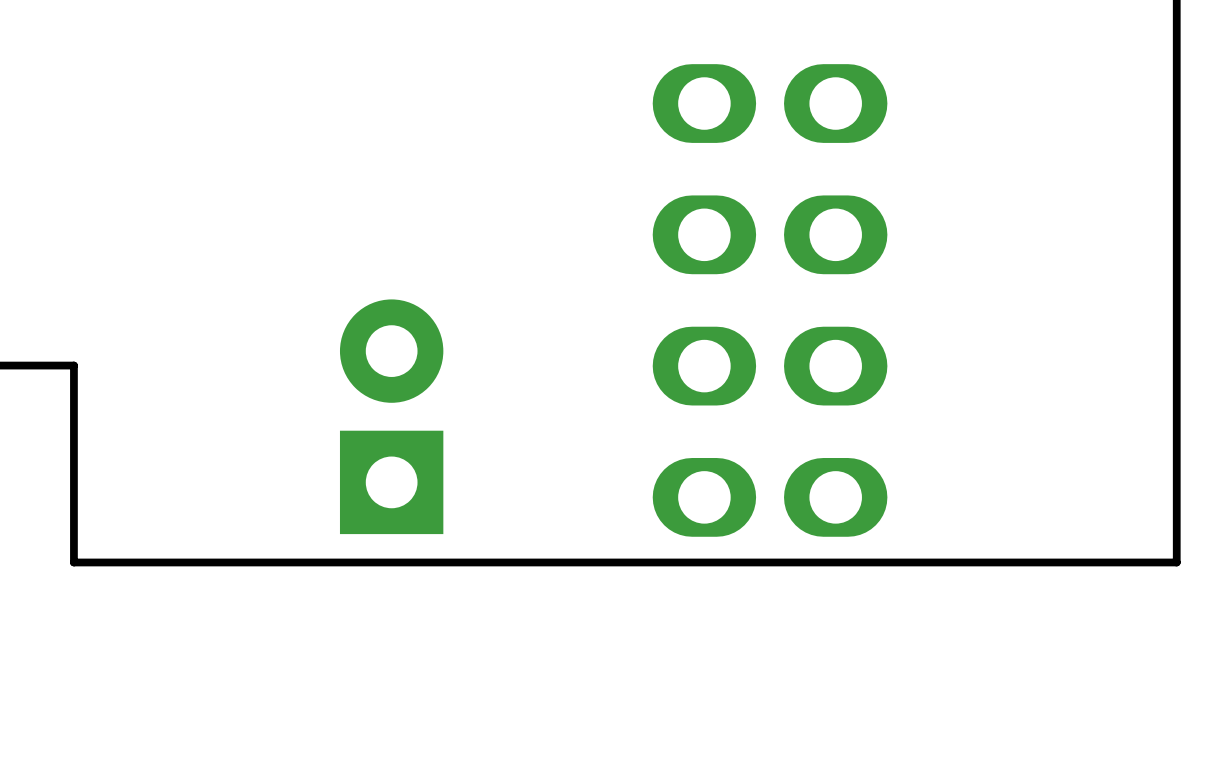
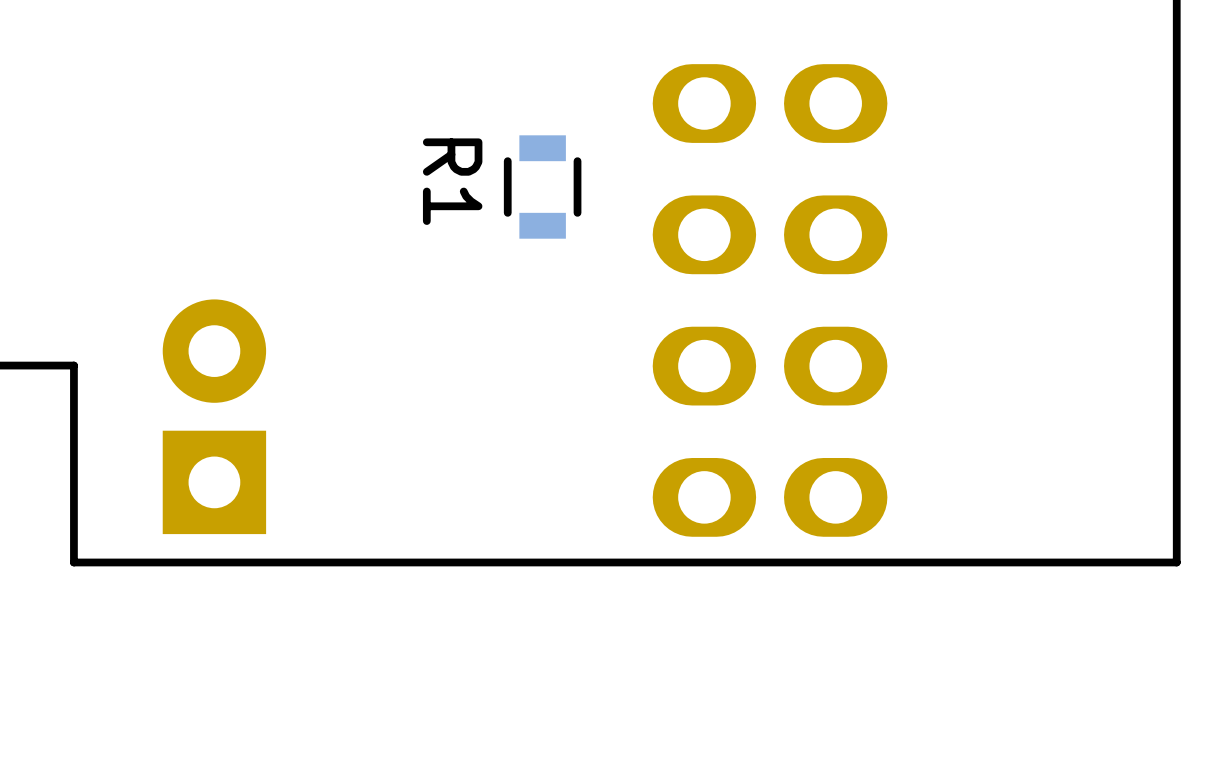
R1: none -> (542, 187)
part position: (391, 416) -> (214, 416)

